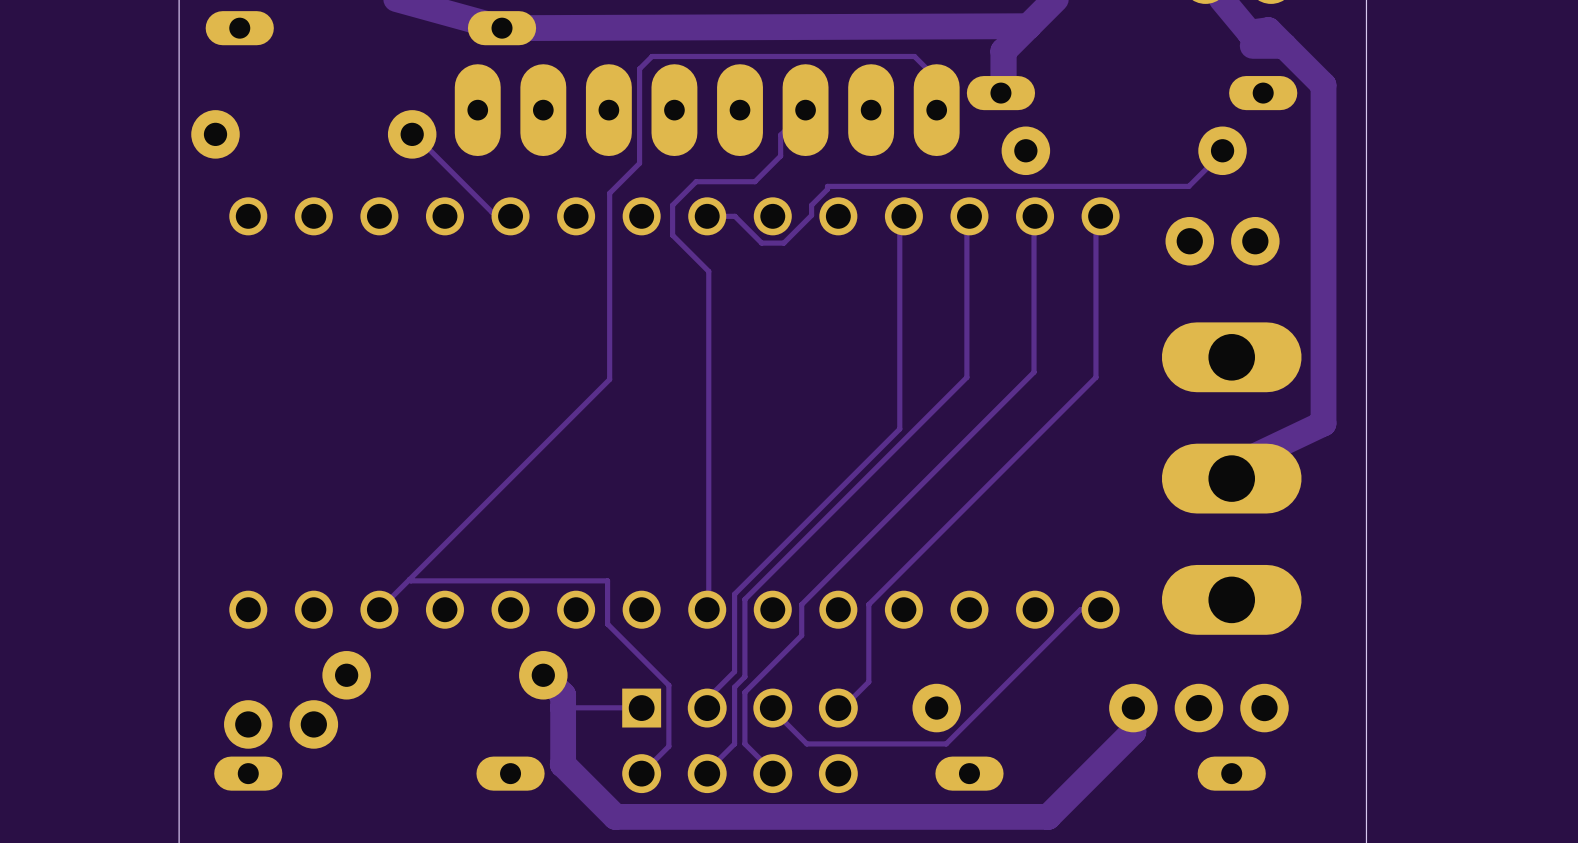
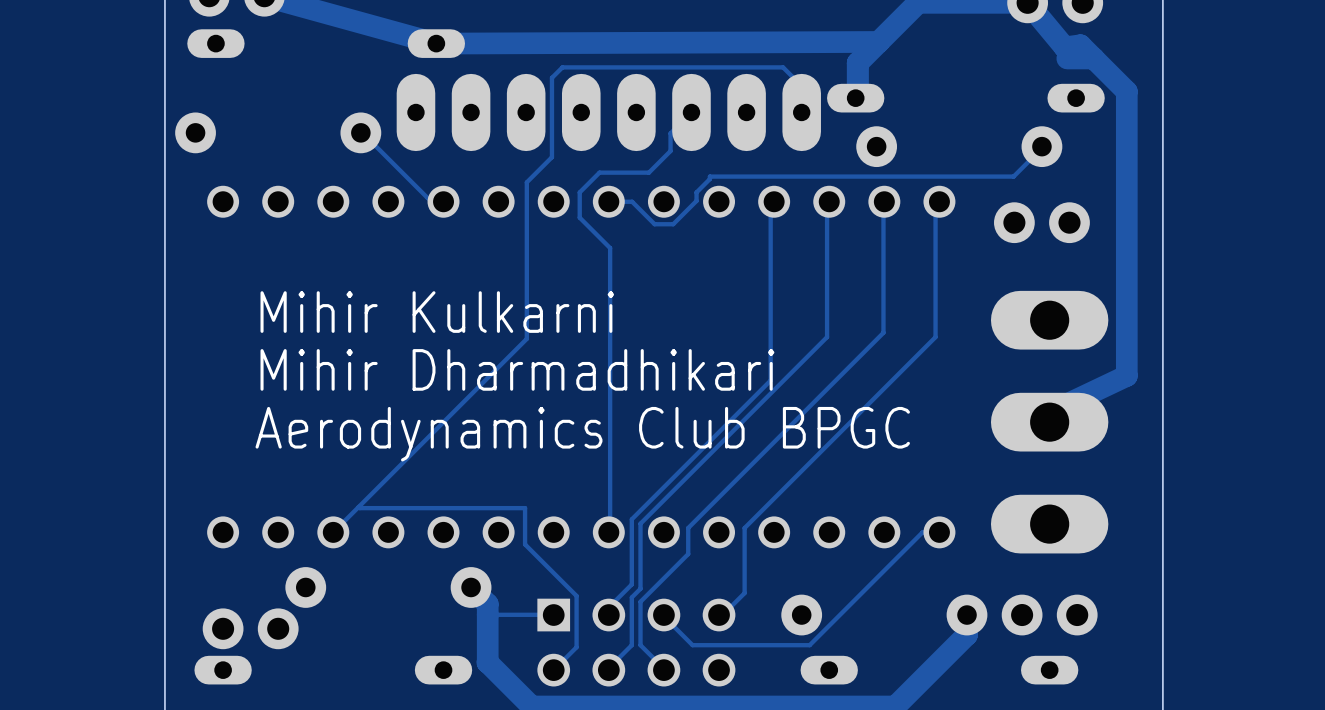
text: none -> Mihir Kulkarni (437, 312)
text: none -> Mihir Dharmadhikari (517, 369)
text: none -> Aerodynamics Club BPGC (582, 434)

